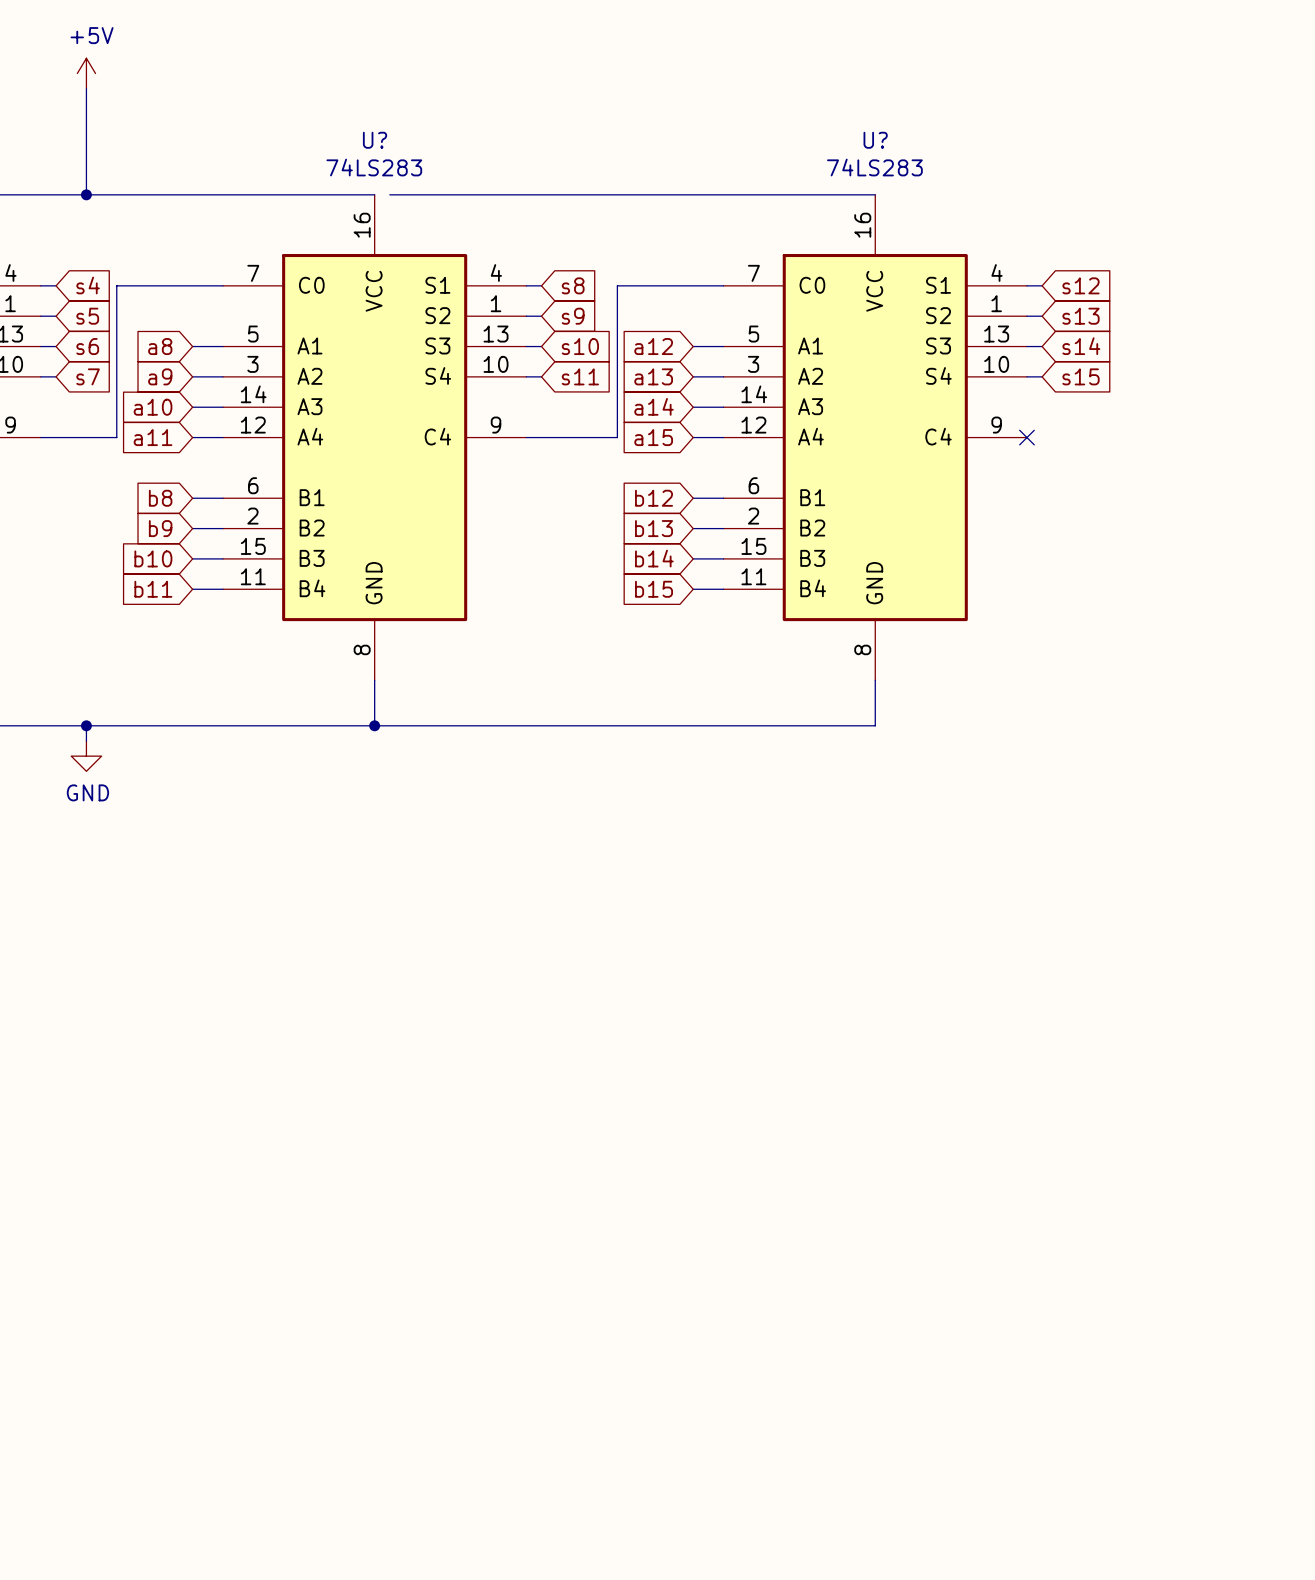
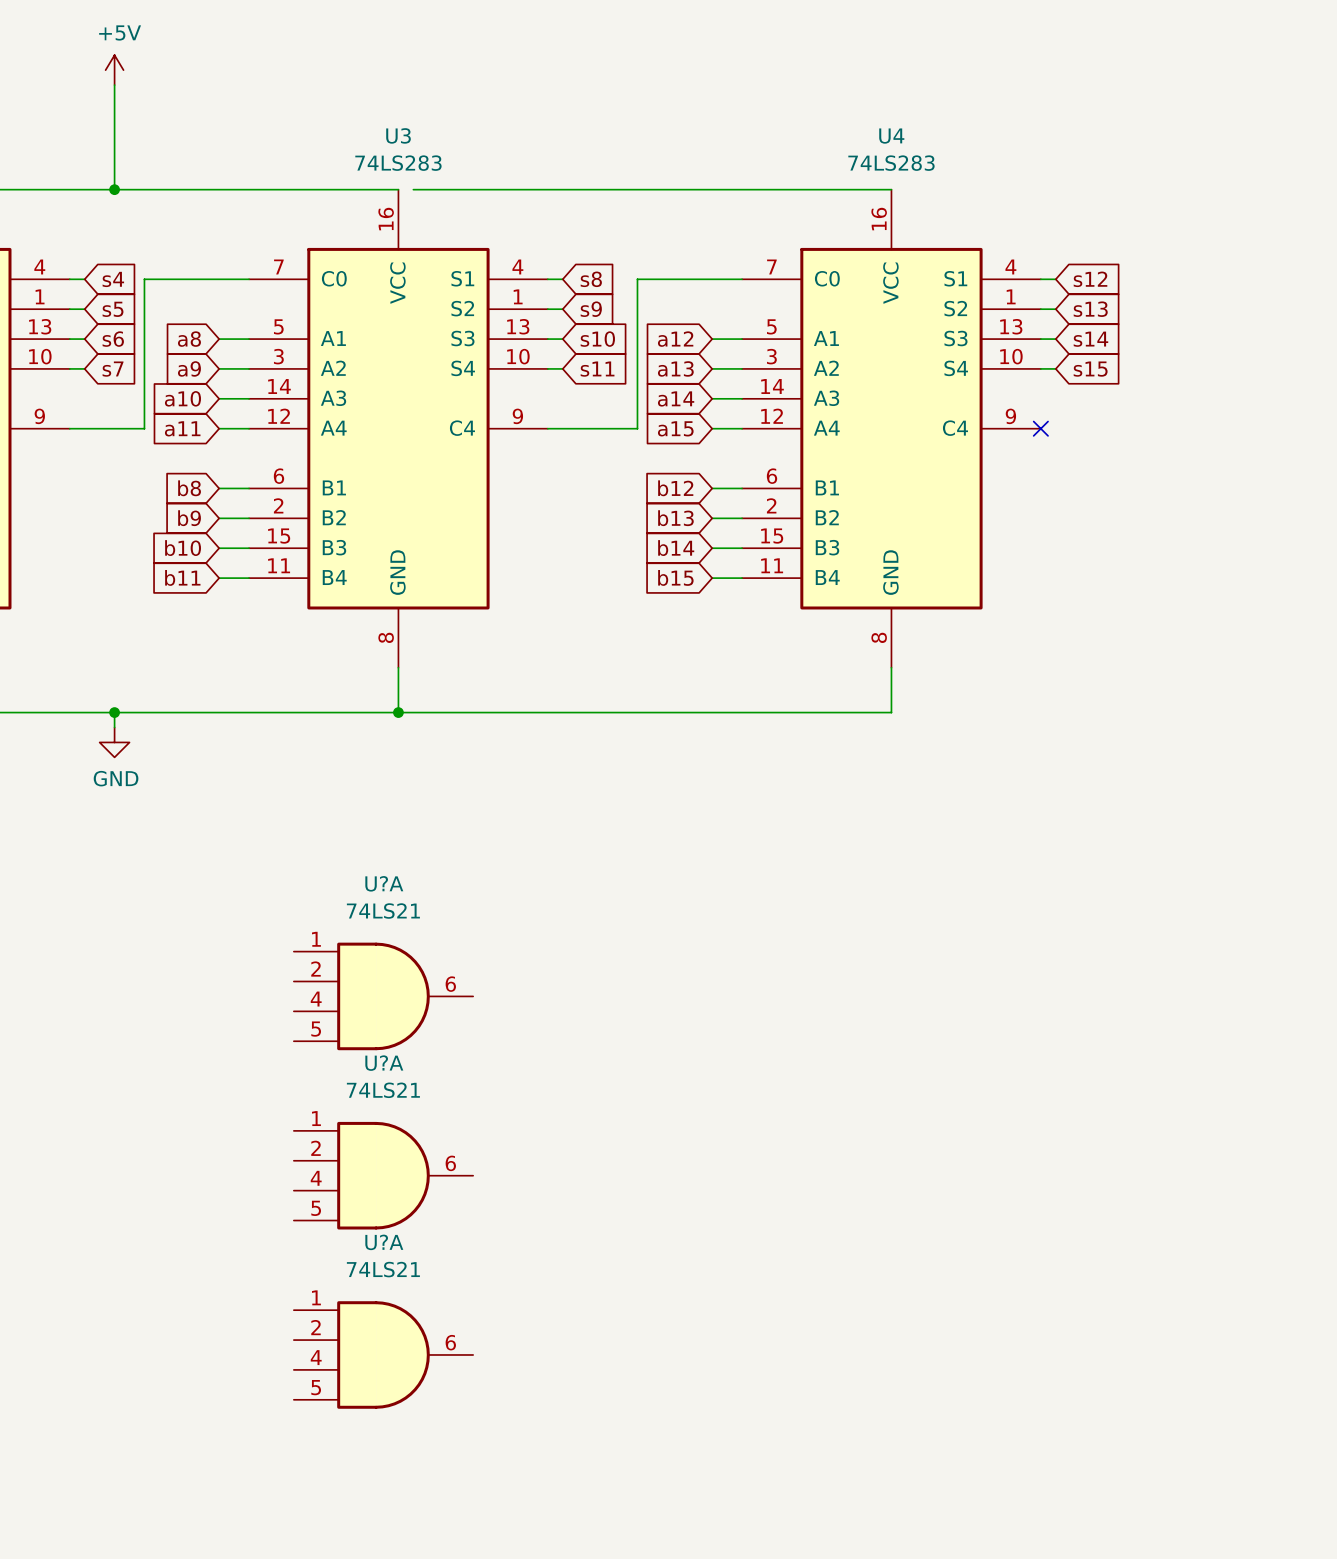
U? name: U? (375, 140) -> U3 (398, 135)
U? name: U? (875, 140) -> U4 (891, 136)
U?A: none -> 74LS21 (383, 996)
U?A: none -> 74LS21 (383, 1175)
U?A: none -> 74LS21 (383, 1354)

